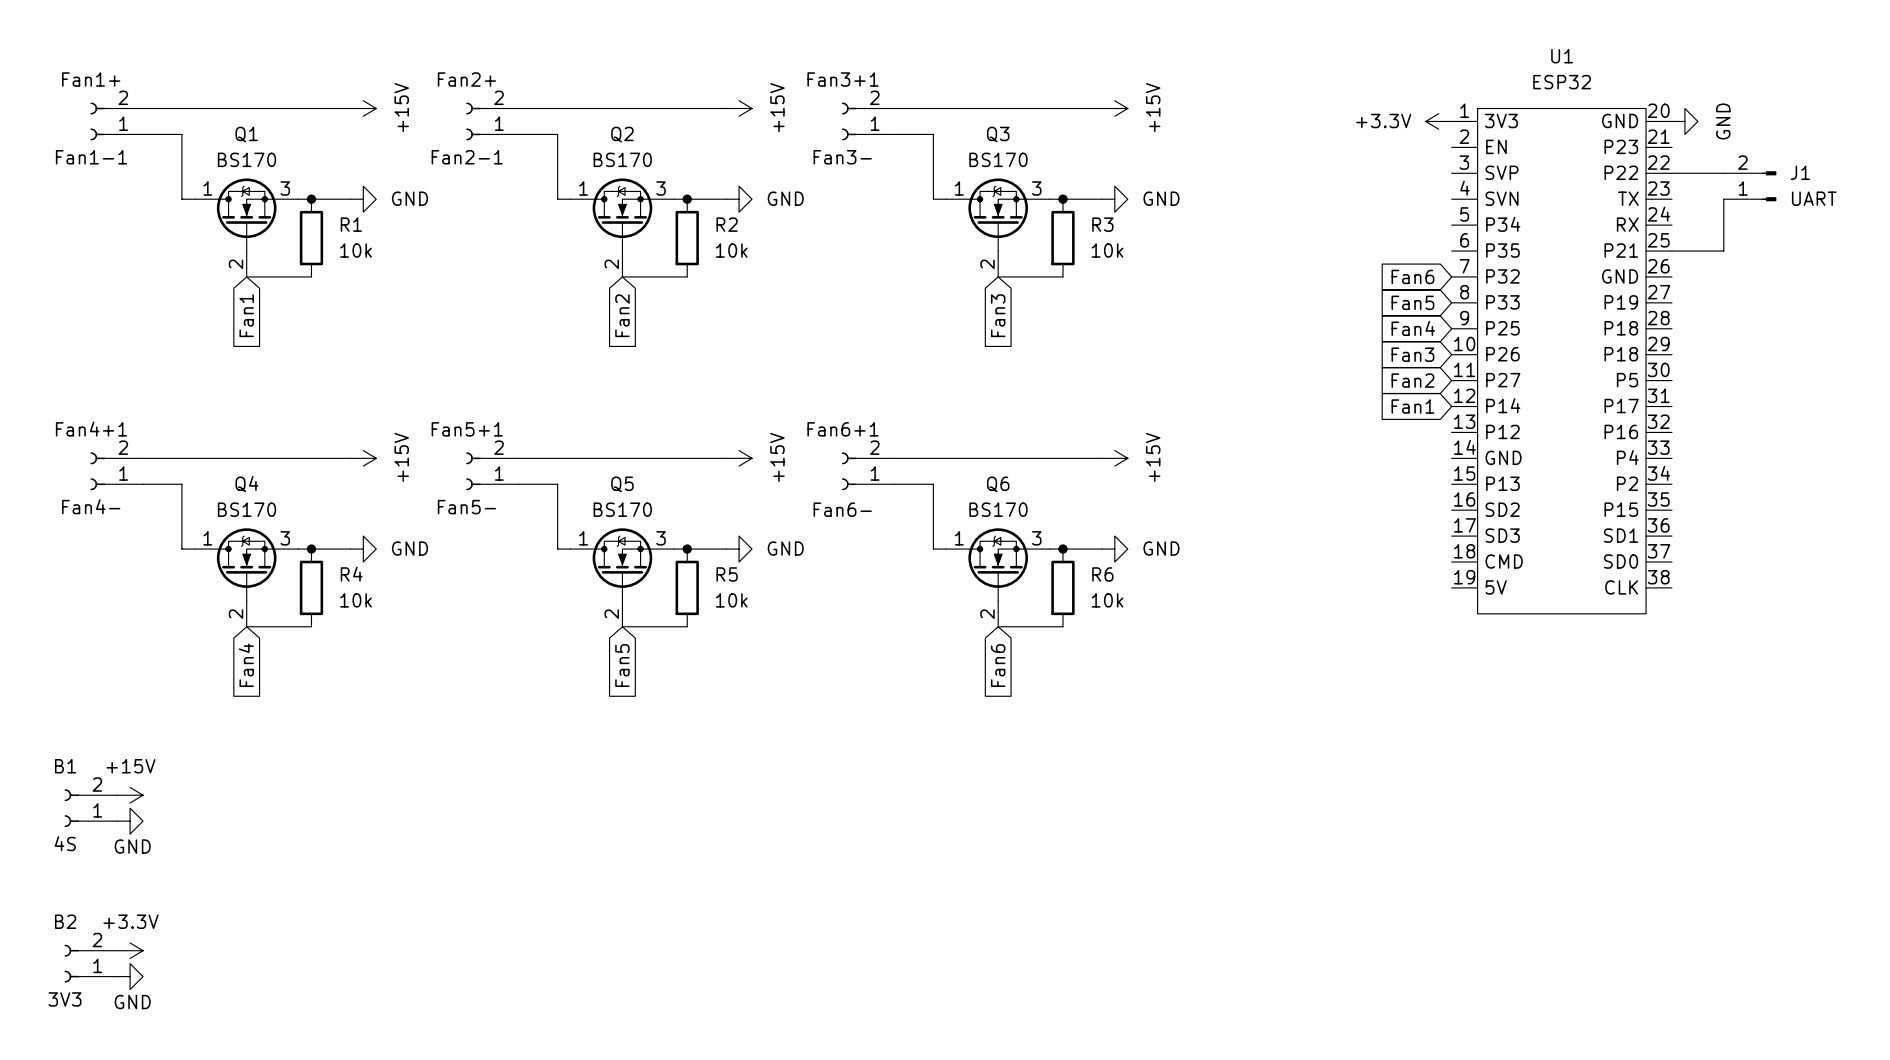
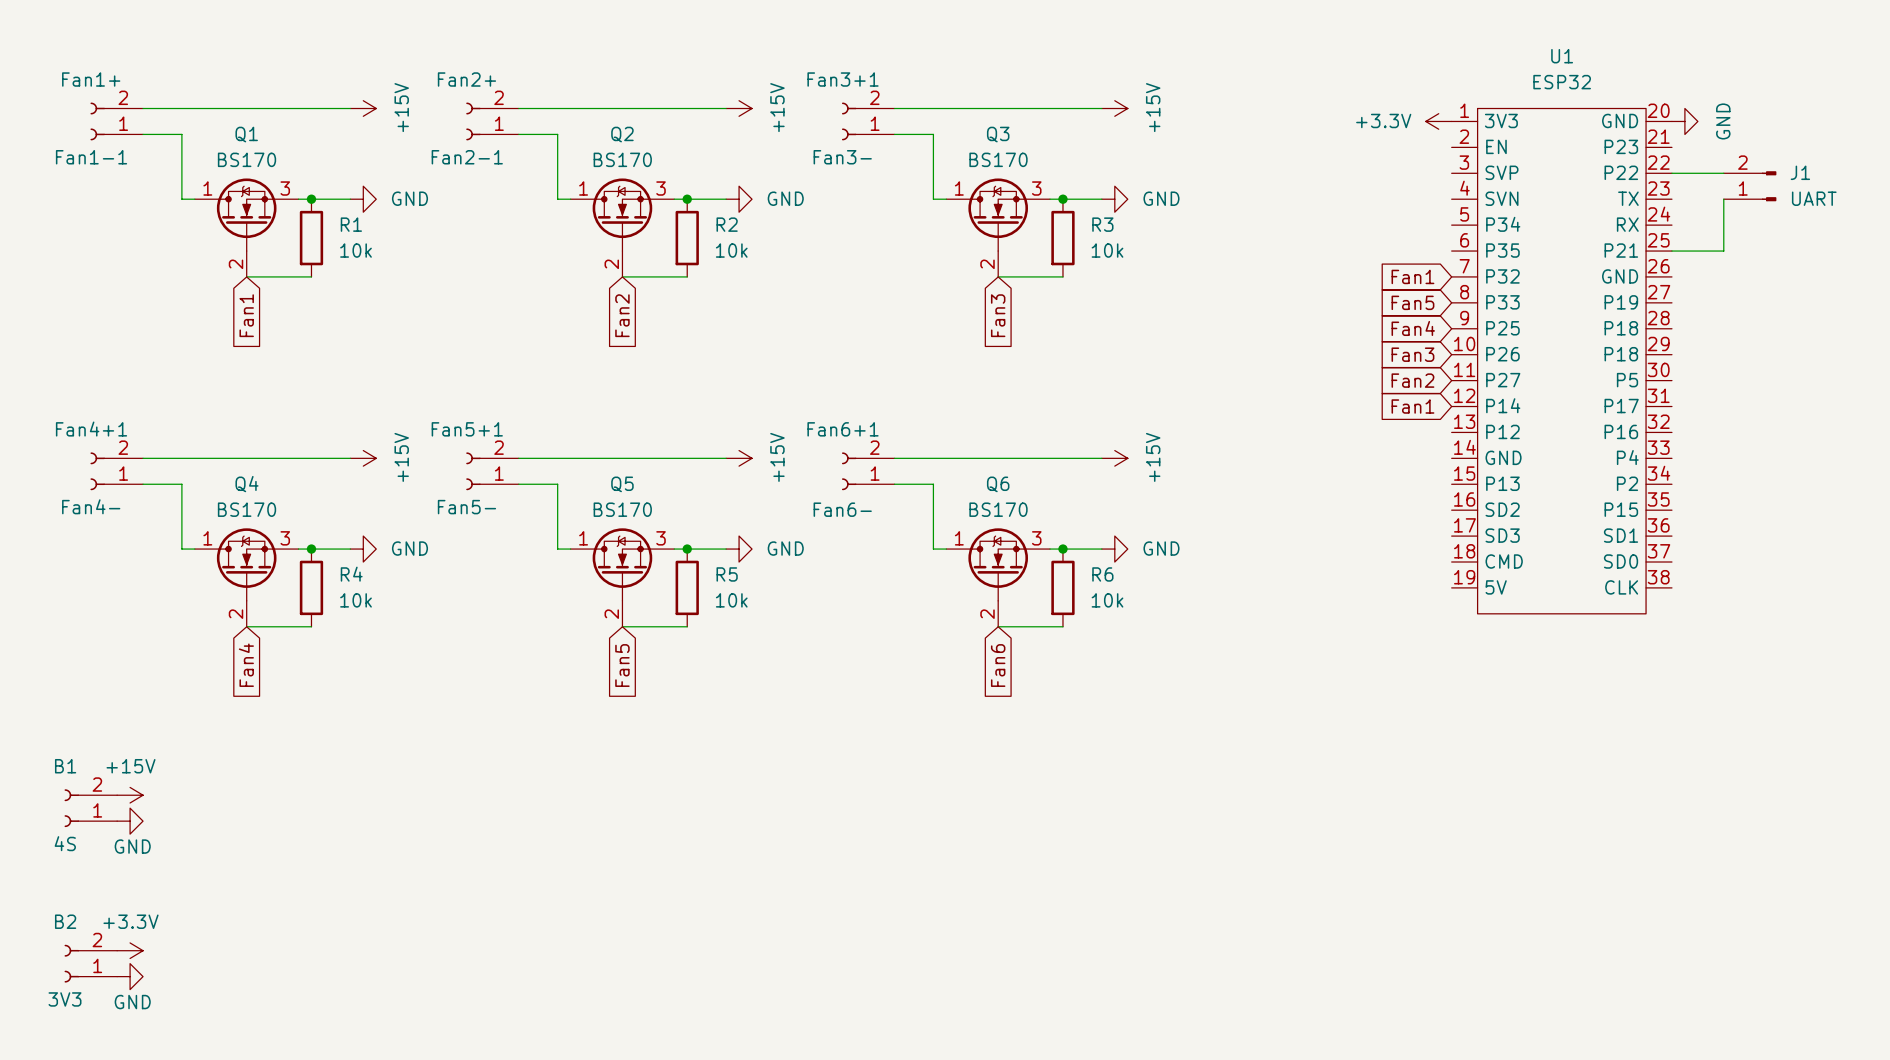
global label: Fan6 (1412, 276) -> Fan1 (1412, 276)

